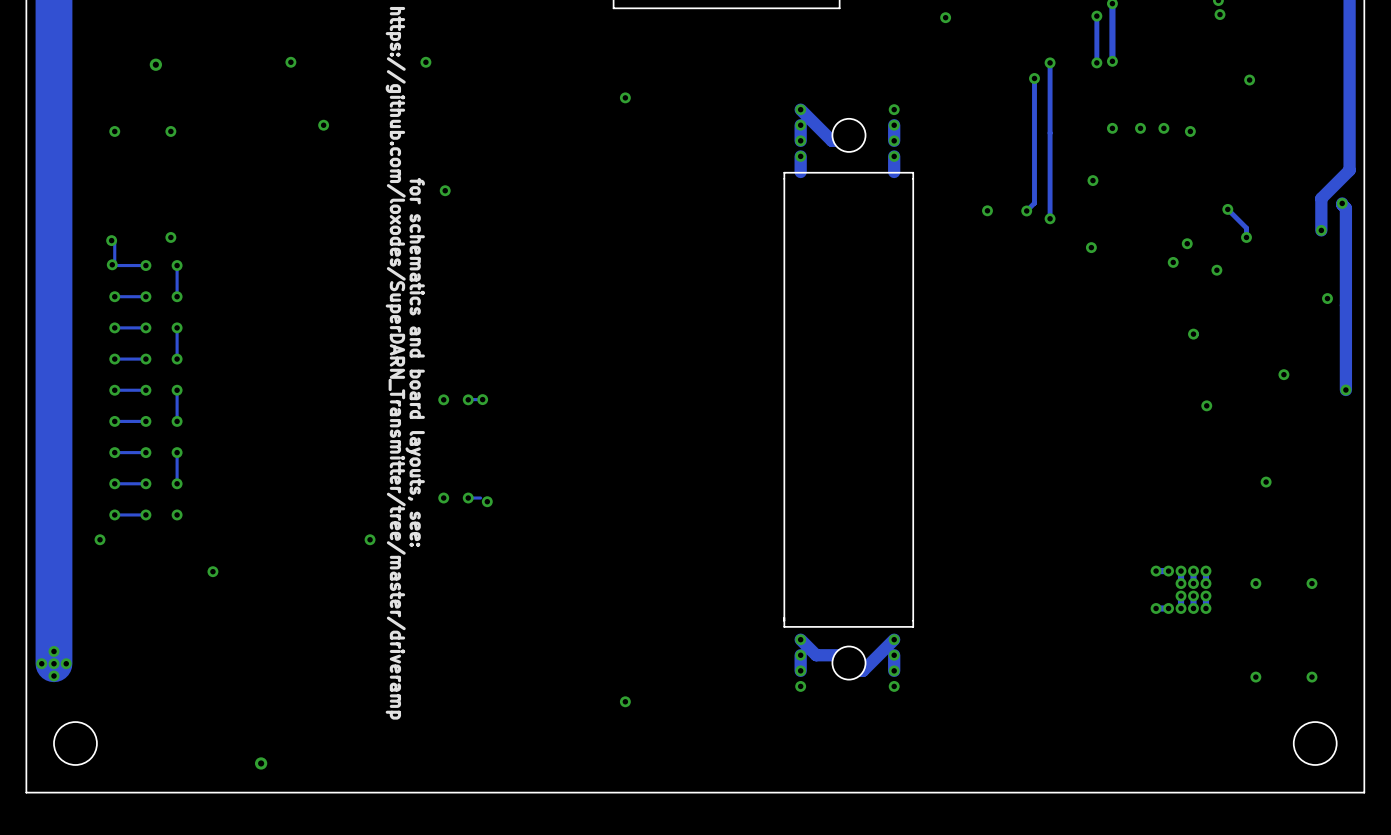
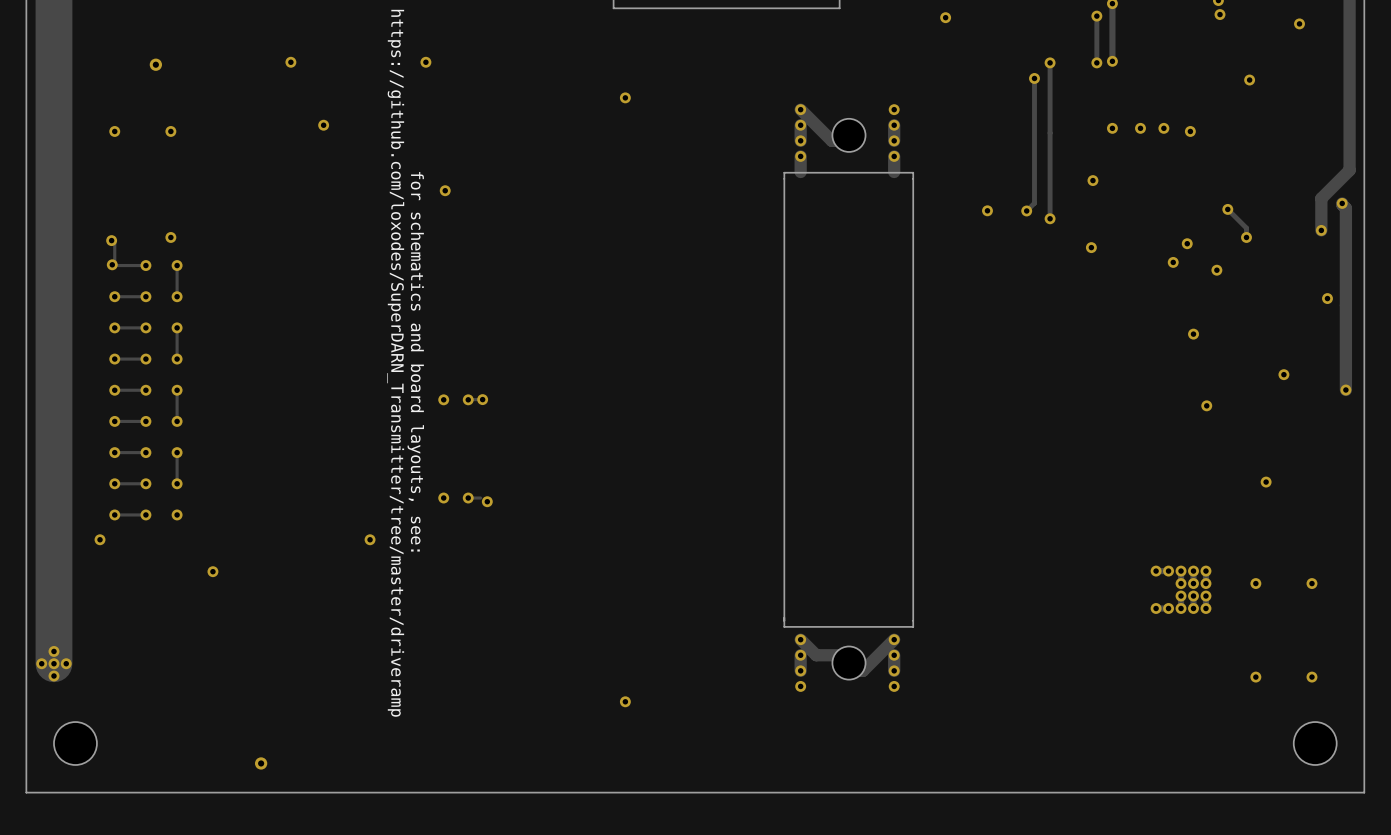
via: none -> (1299, 23)

